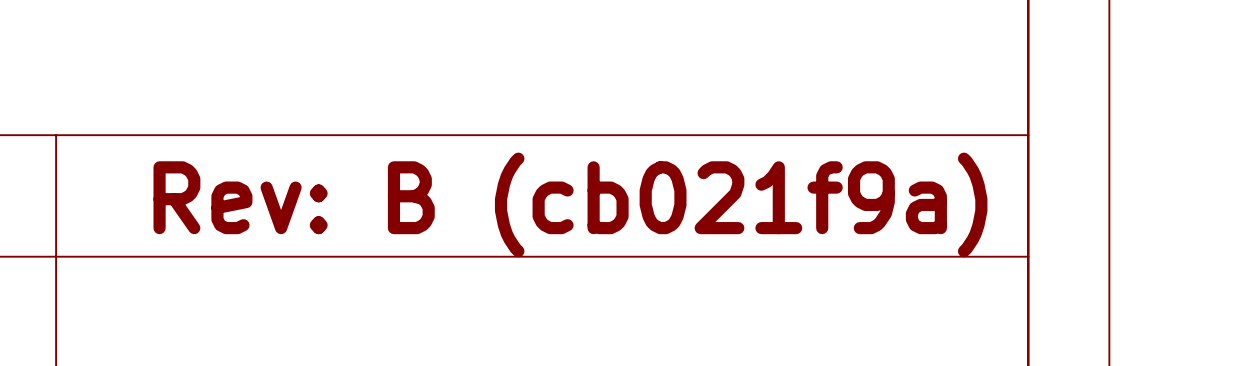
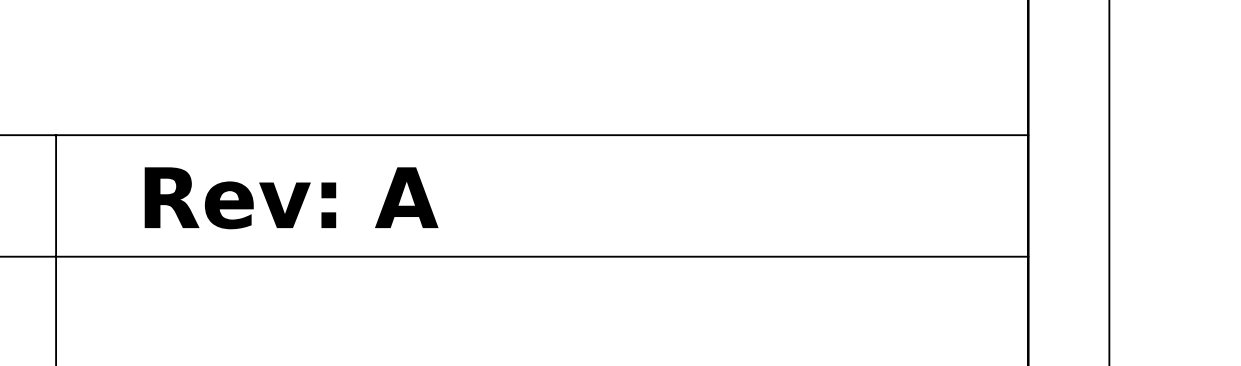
title block: Rev: B (cb021f9a) (570, 204) -> Rev: A (291, 198)

